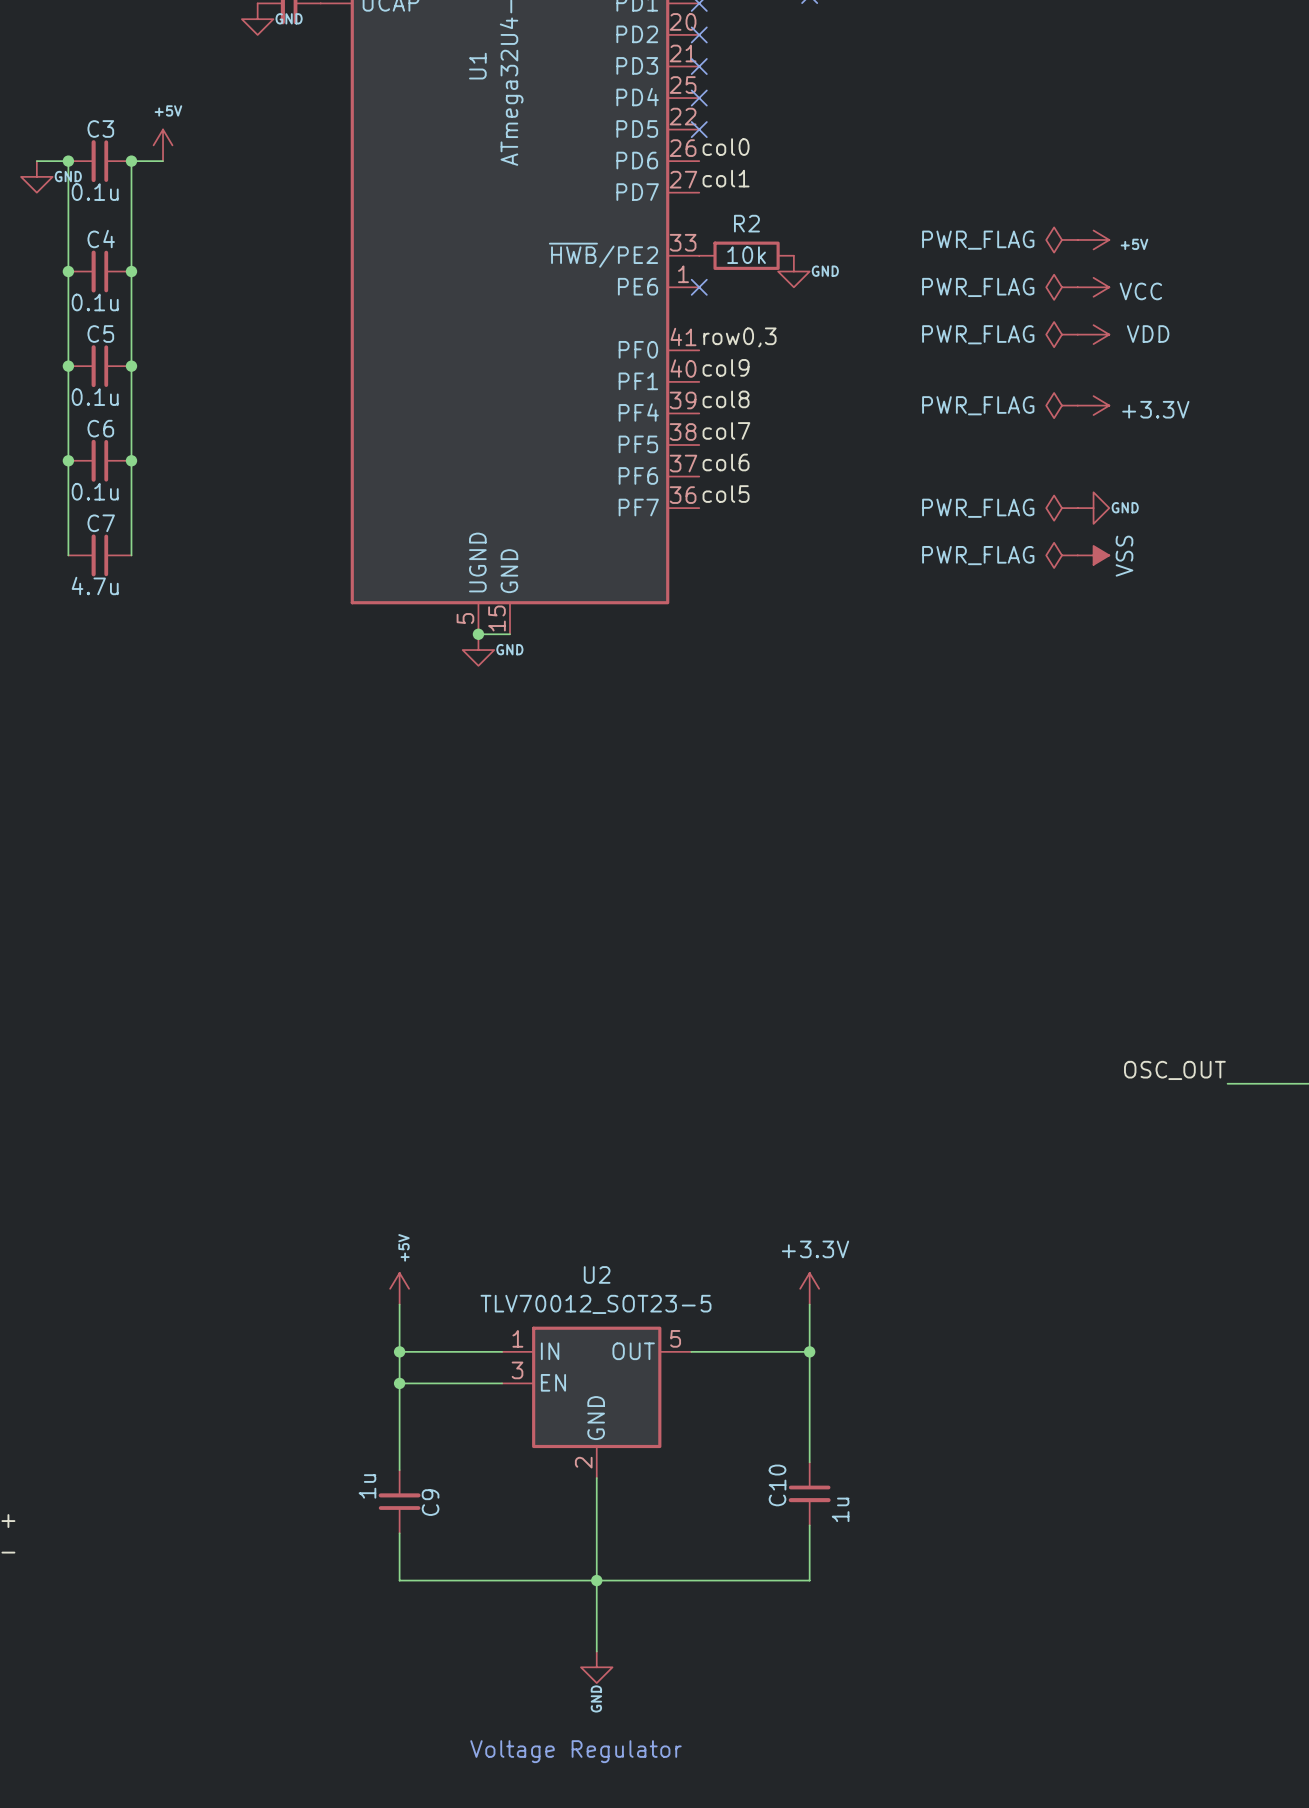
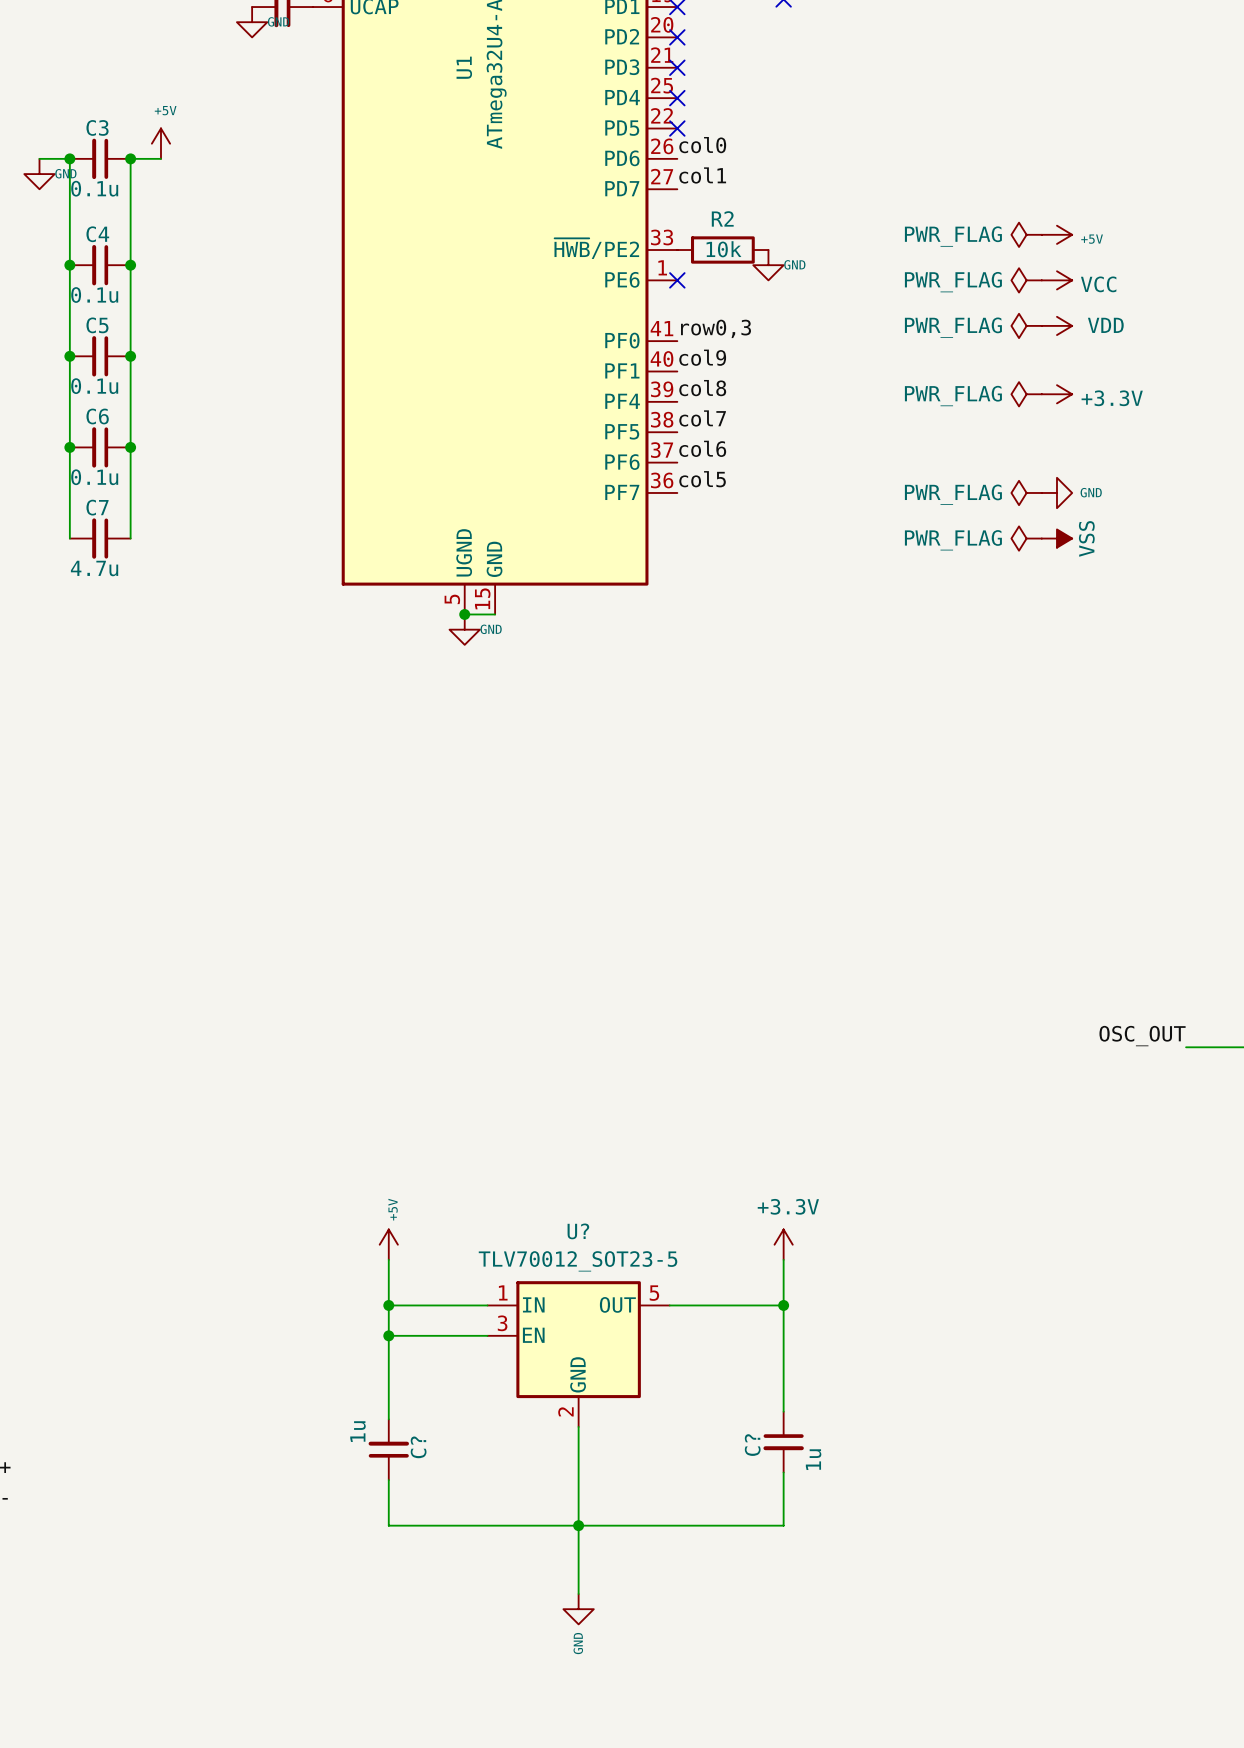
U2 name: U2 (597, 1274) -> U? (578, 1231)
C10 name: C10 (777, 1485) -> C? (752, 1445)
C9 name: C9 (430, 1502) -> C? (418, 1447)
text: Voltage Regulator (575, 1751) -> none

